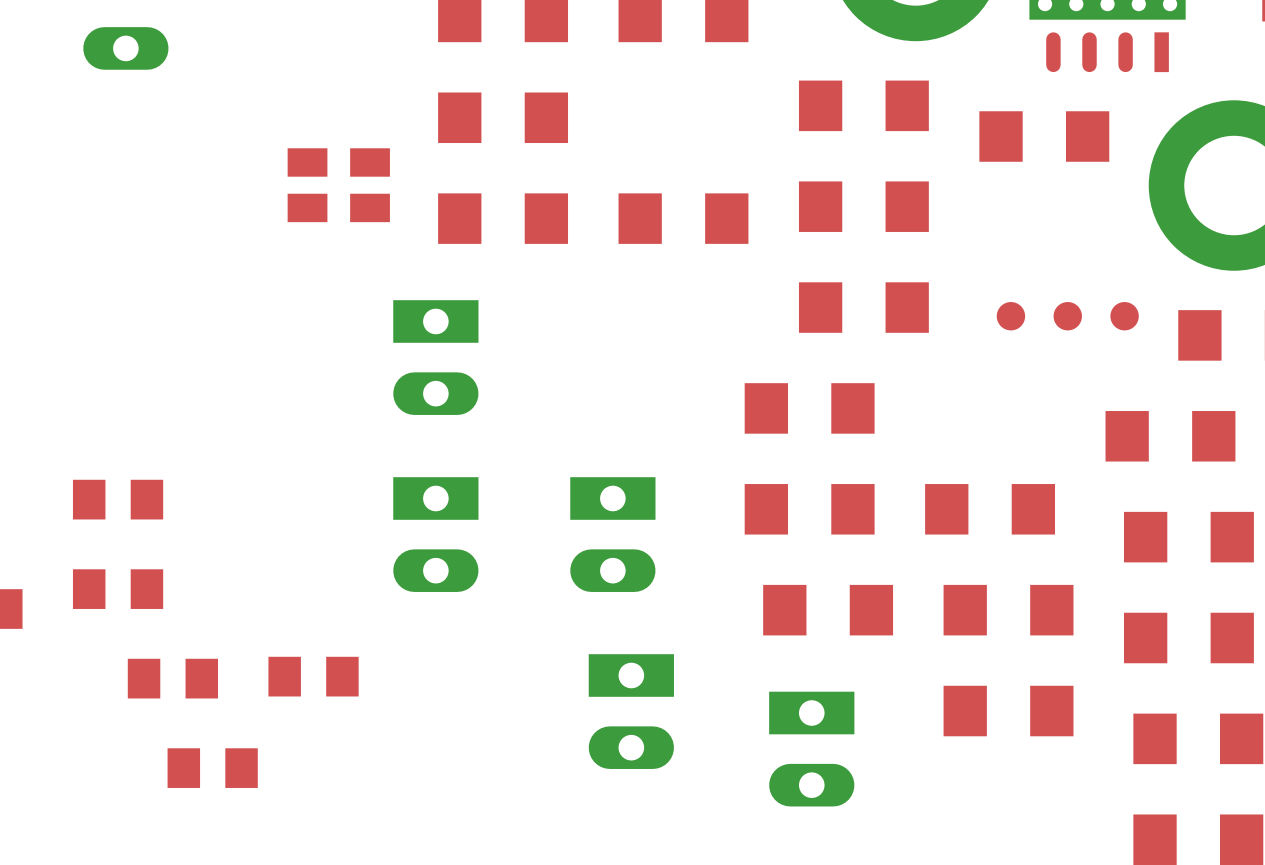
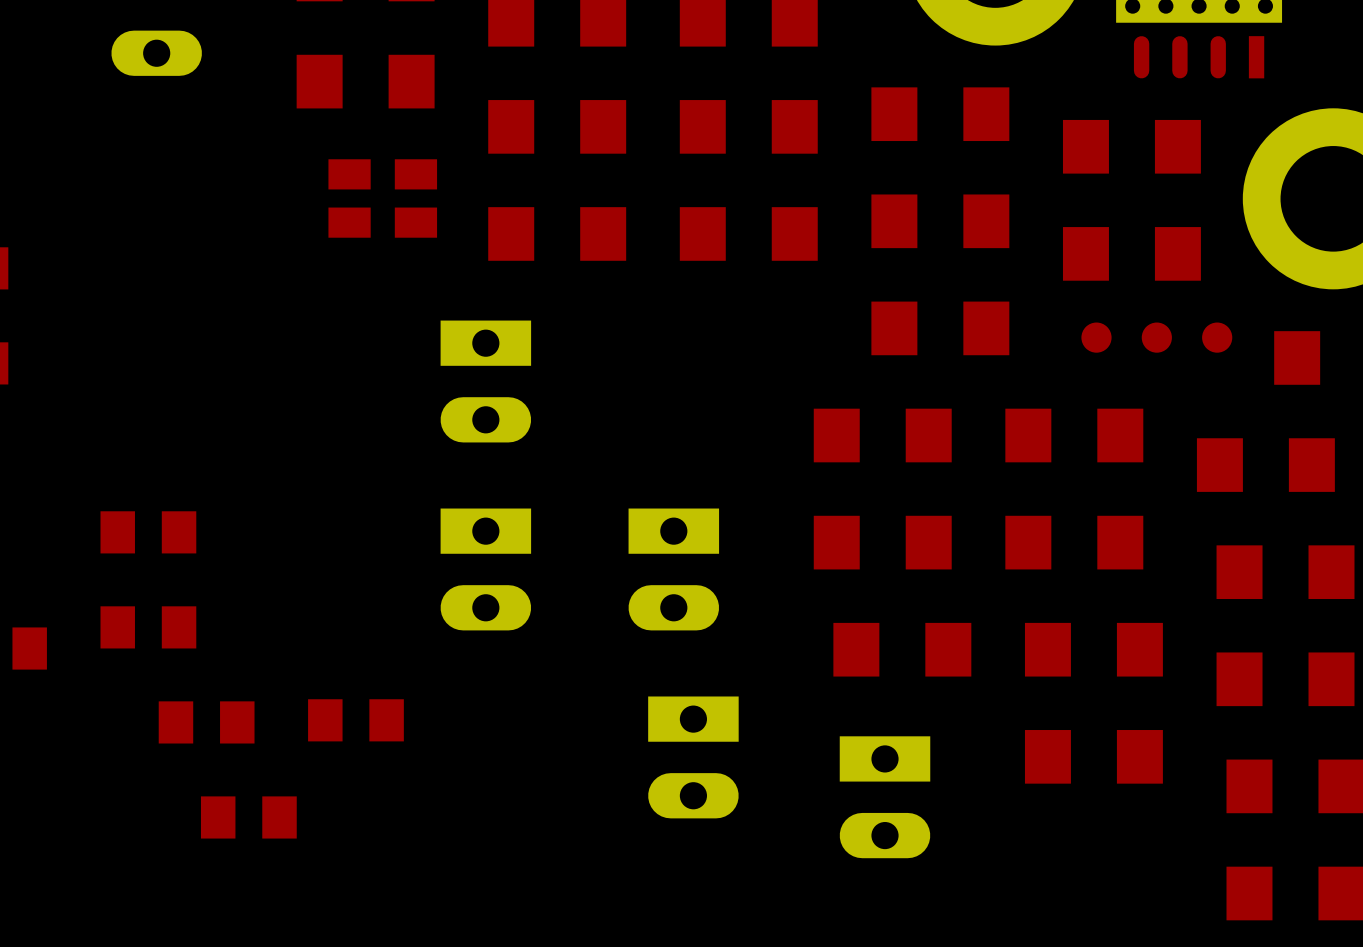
part: none -> (365, 81)
part: none -> (748, 126)
part: none -> (1131, 253)
part: none -> (1074, 435)

